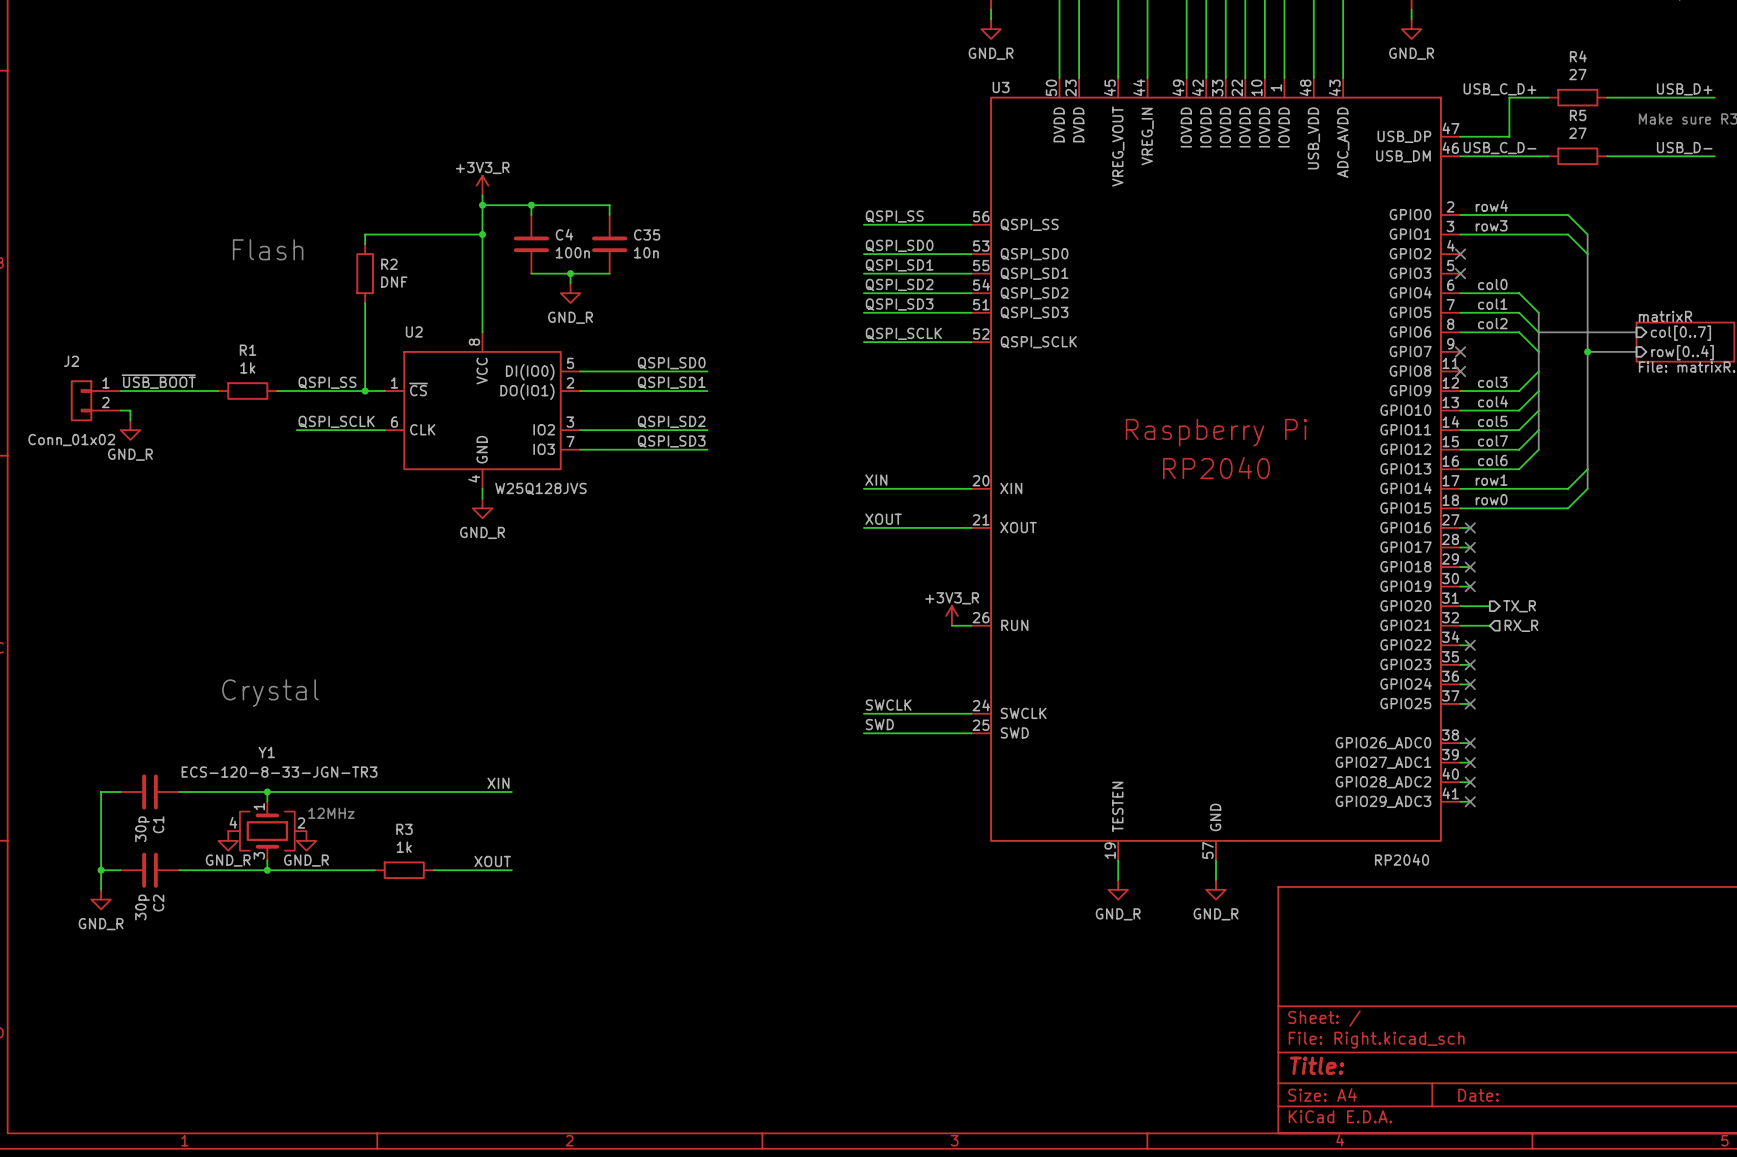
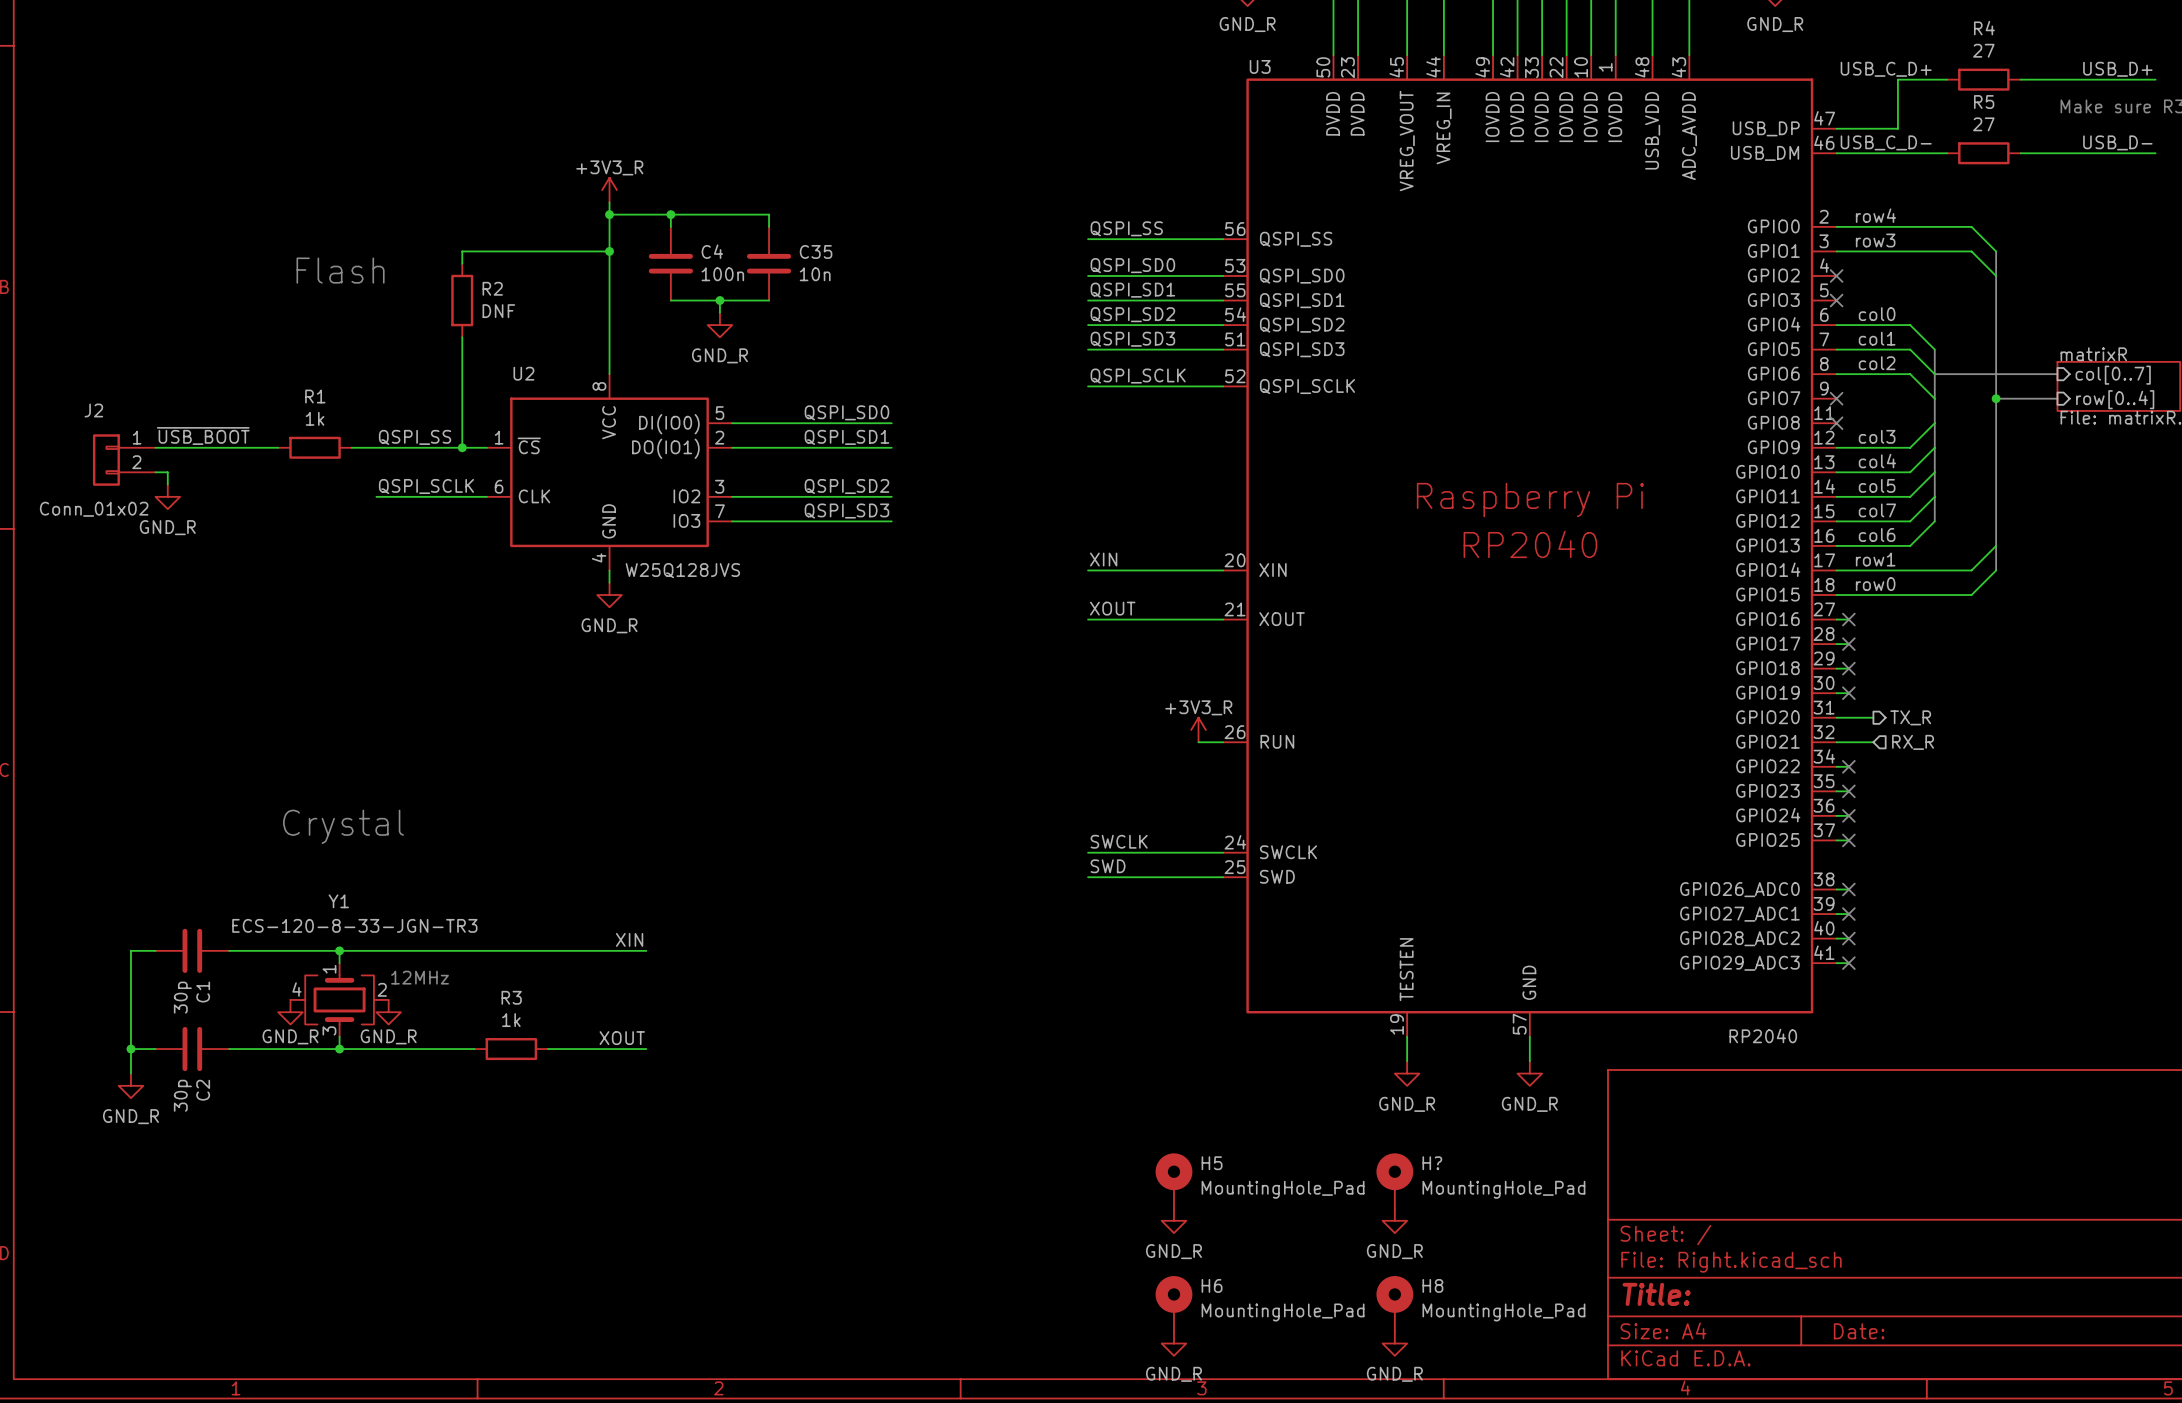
H5: none -> MountingHole_Pad (1173, 1180)
H?: none -> MountingHole_Pad (1394, 1180)
power symbol: none -> GND_R (1173, 1220)
power symbol: none -> GND_R (1394, 1220)
H6: none -> MountingHole_Pad (1173, 1303)
H8: none -> MountingHole_Pad (1394, 1303)
power symbol: none -> GND_R (1173, 1343)
power symbol: none -> GND_R (1394, 1343)

